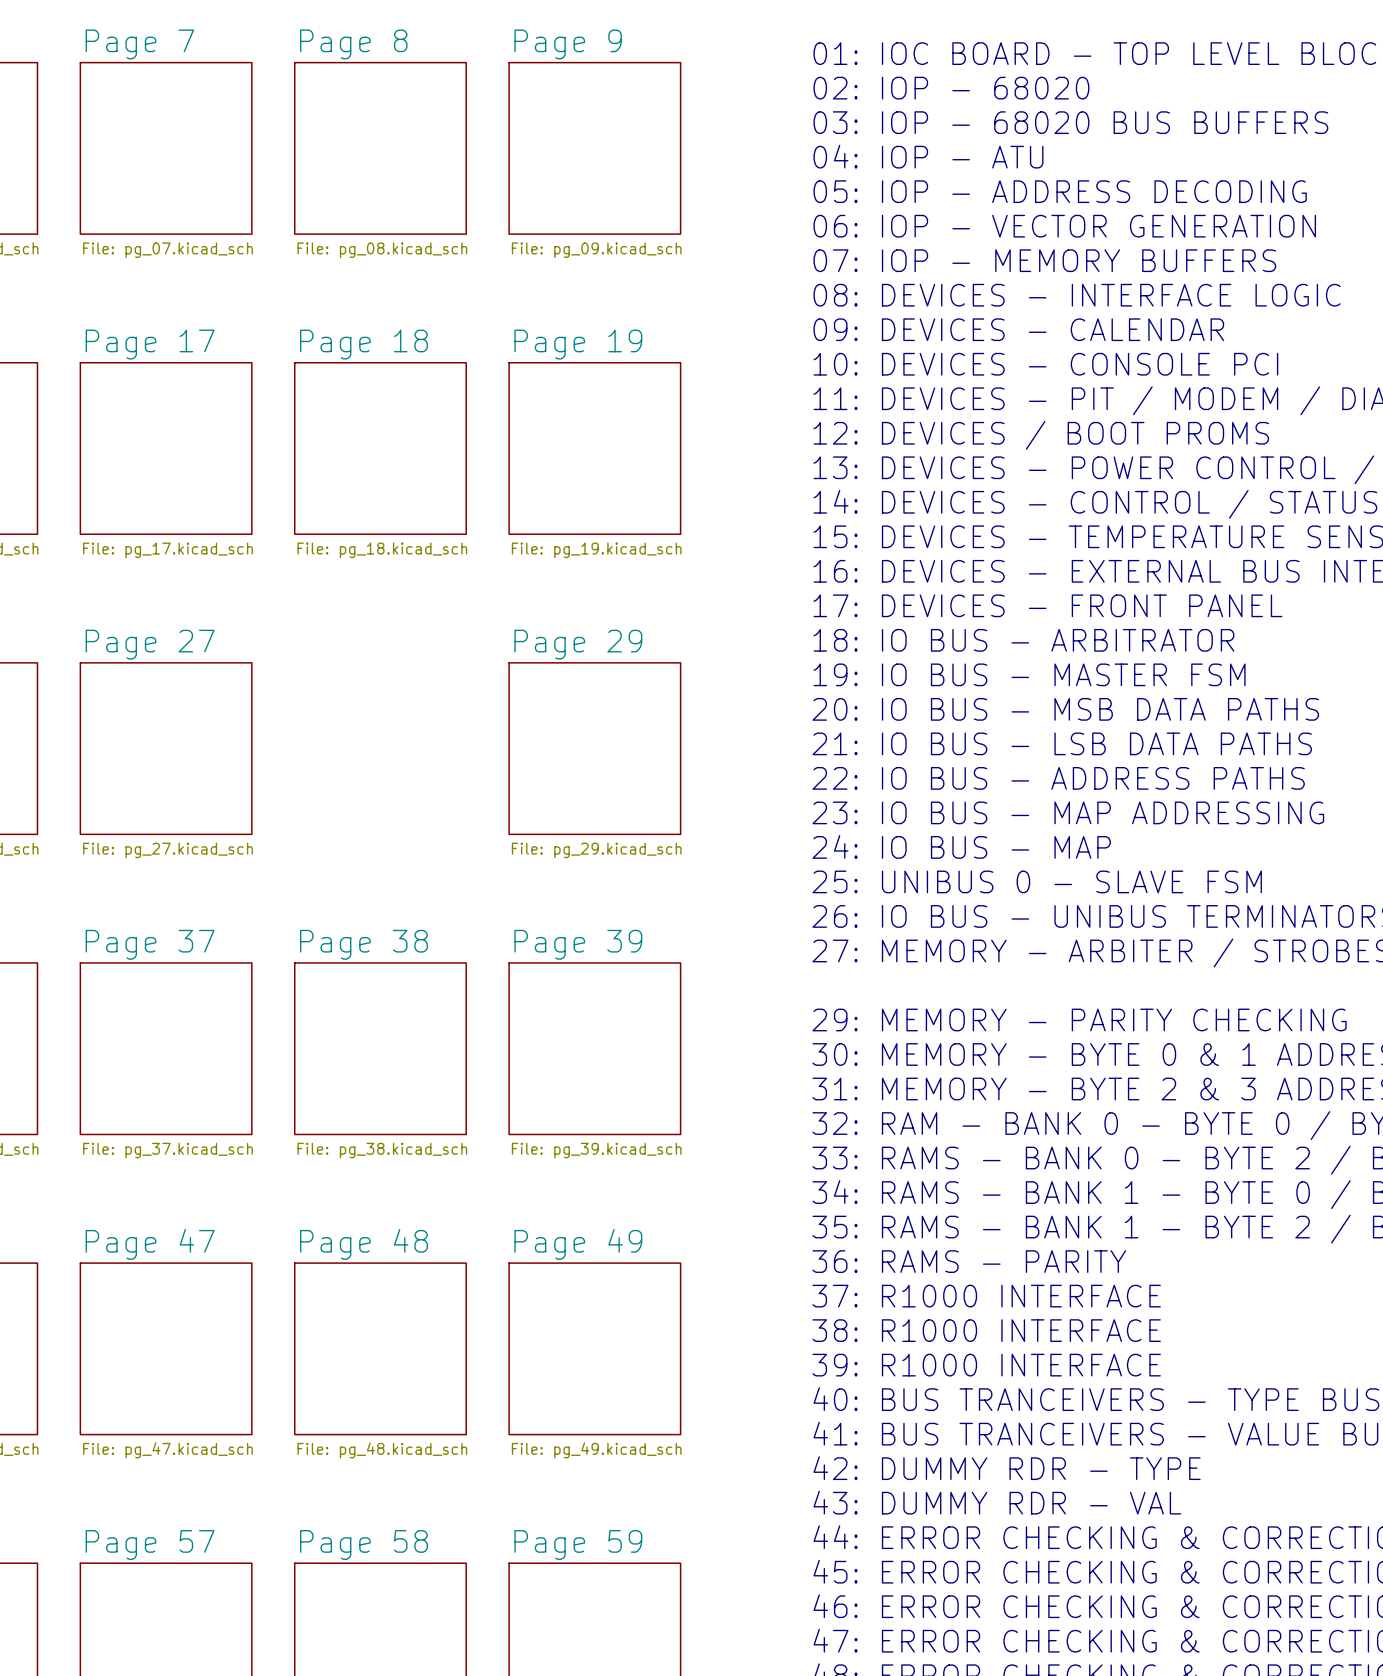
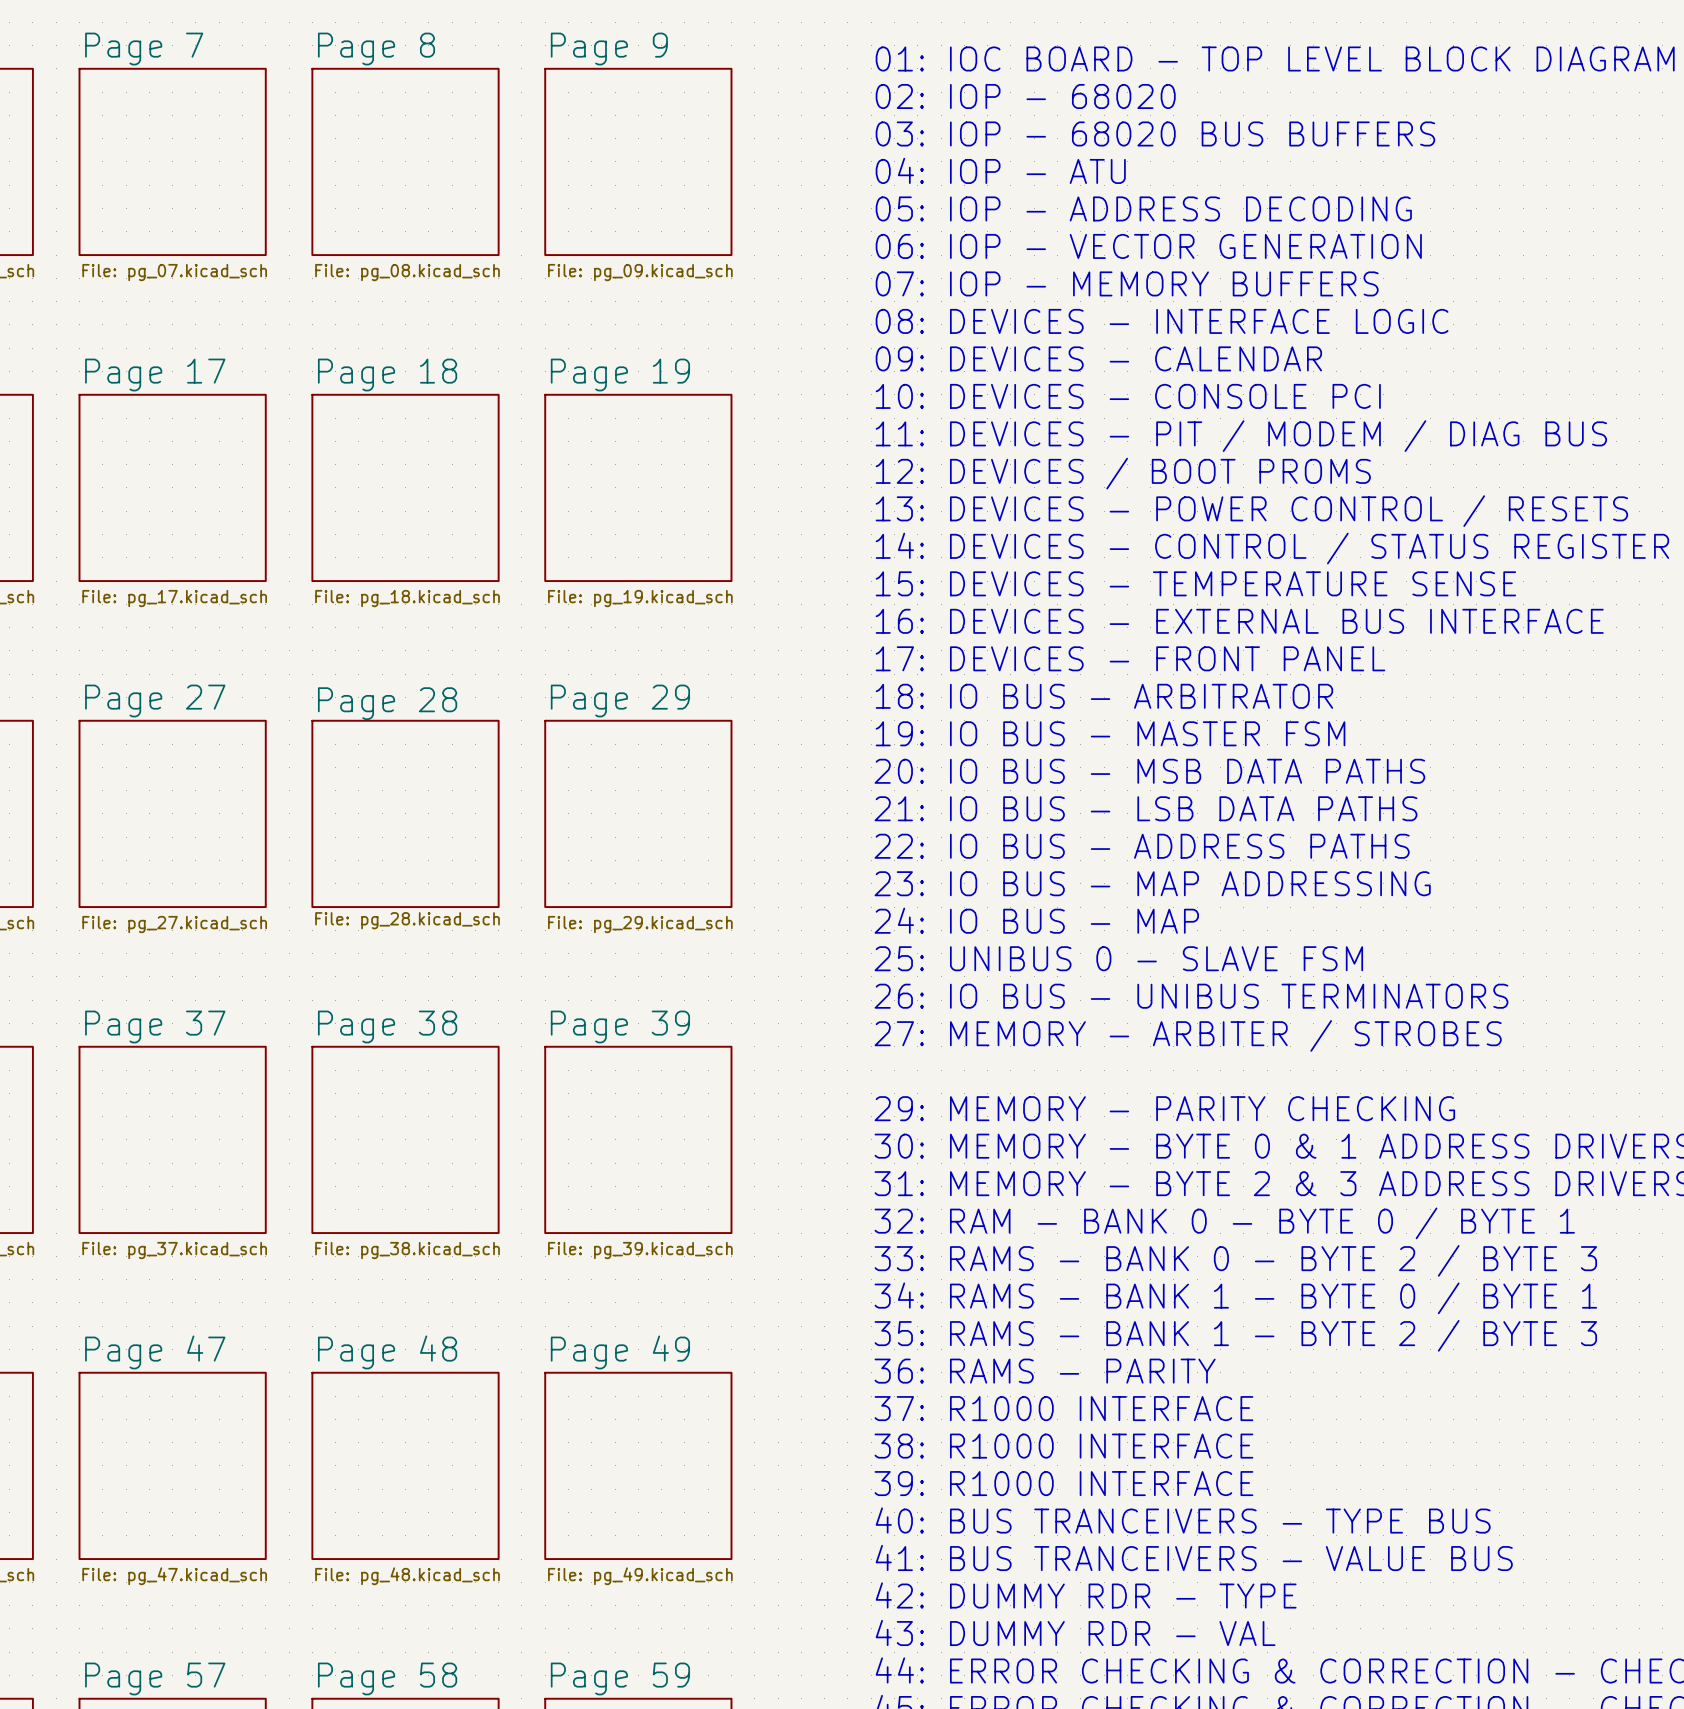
sheet Page 28: none -> File: pg_28.kicad_sch (405, 813)

